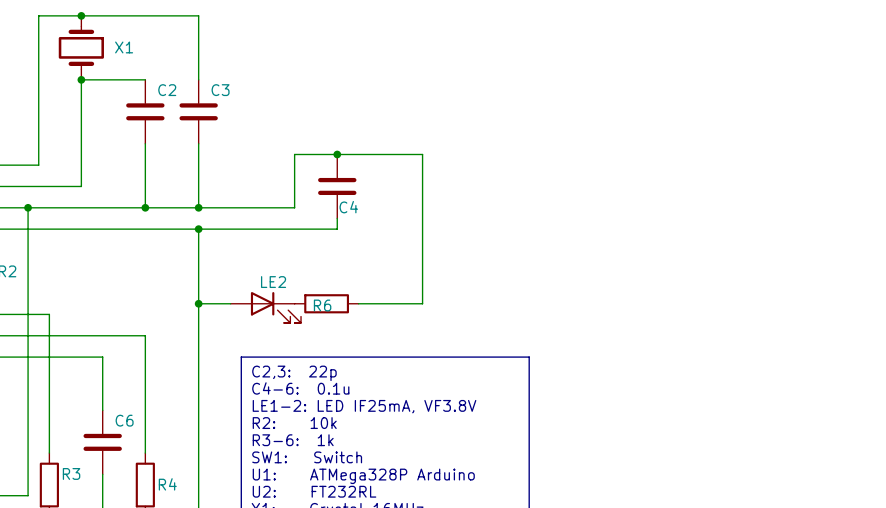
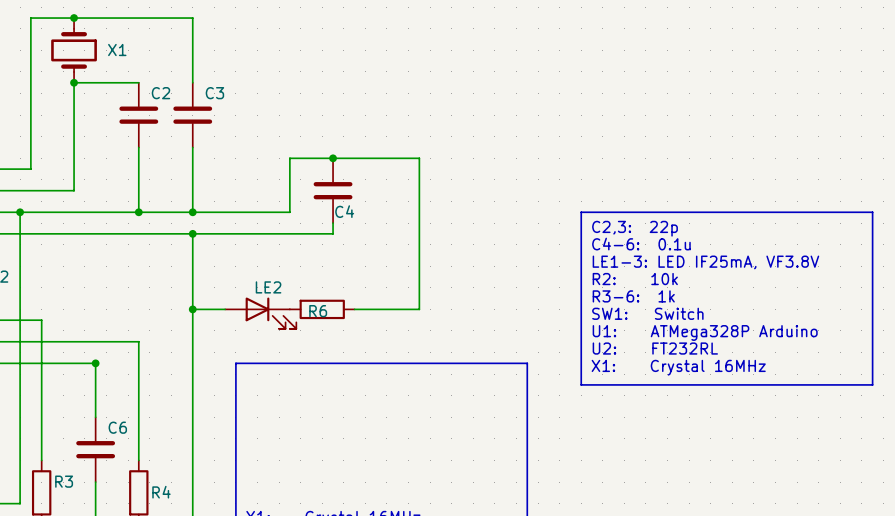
line: none -> (581, 212) (872, 212) (872, 384) (581, 384) (581, 212)
text: none -> C2,3: 22p (635, 228)
text: none -> C4-6: 0.1u (641, 244)
text: none -> LE1-3: LED IF25mA, VF3.8V (705, 262)
text: none -> R2: 10k (635, 279)
text: none -> R3-6: 1k (633, 296)
text: none -> SW1: Switch (647, 313)
text: none -> U1: ATMega328P Arduino (705, 332)
text: none -> U2: FT232RL (655, 348)
junction: none -> (95, 363)
text: none -> X1: Crystal 16MHz (678, 367)
text: C2,3: 22p (294, 373) -> none
text: C4-6: 0.1u (300, 388) -> none
text: LE1-2: LED IF25mA, VF3.8V (364, 406) -> none
text: R2: 10k (294, 423) -> none
text: R3-6: 1k (293, 440) -> none
text: SW1: Switch (307, 457) -> none
text: U1: ATMega328P Arduino (363, 476) -> none
text: U2: FT232RL (314, 491) -> none

